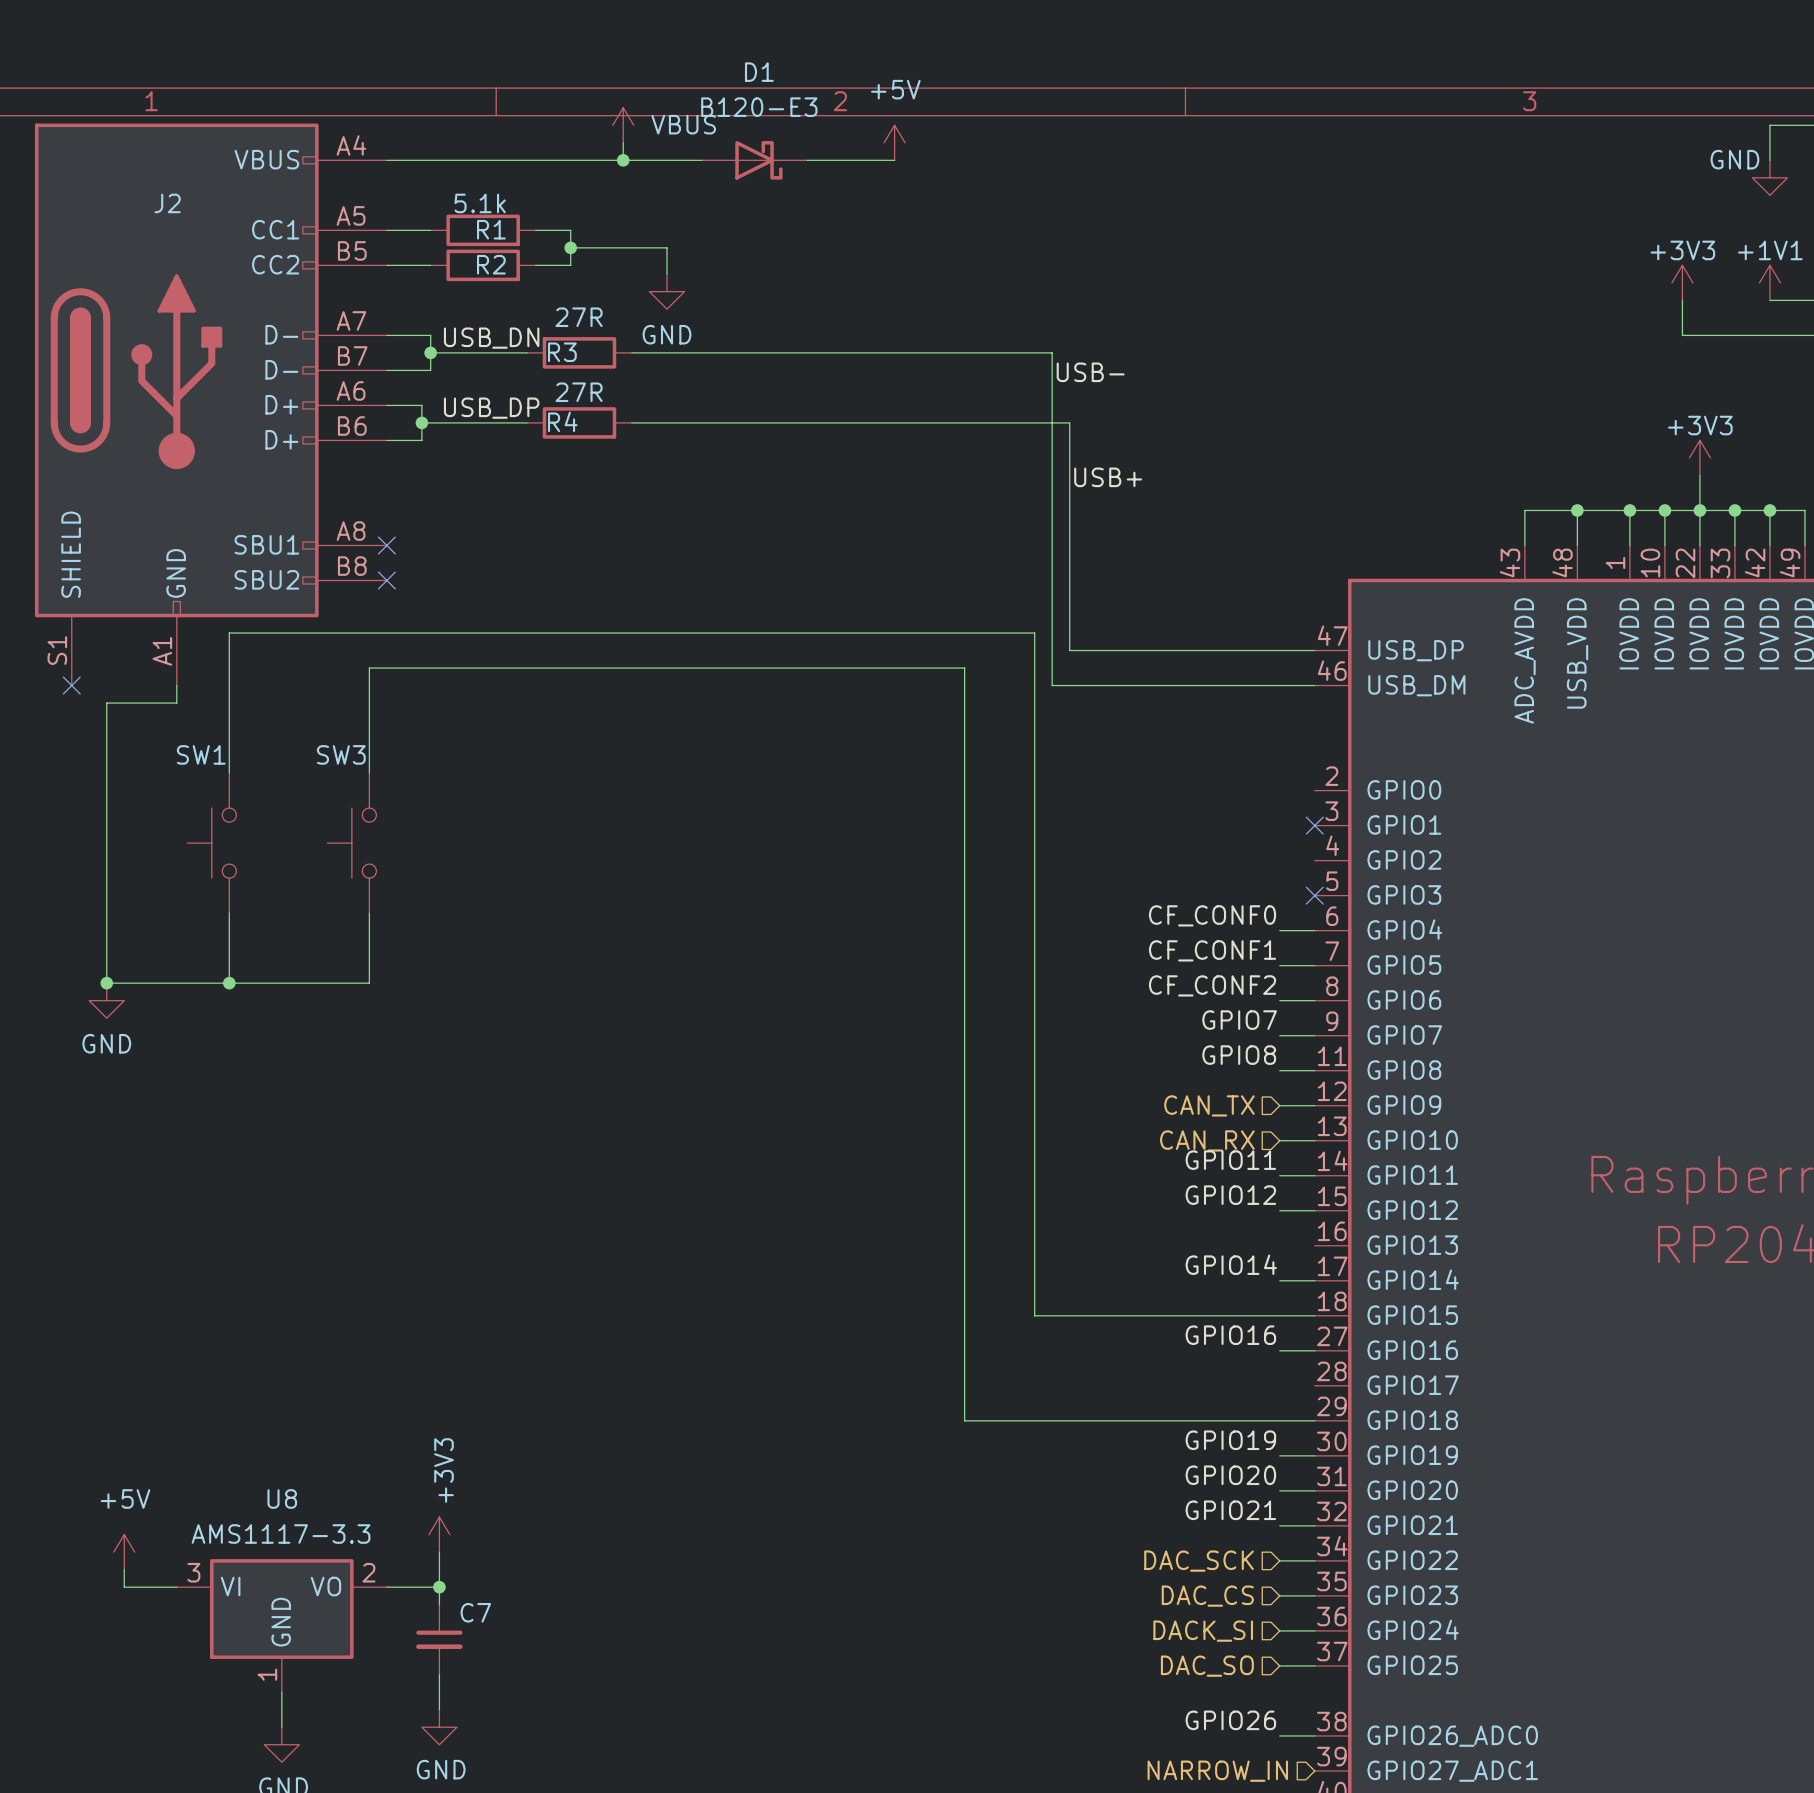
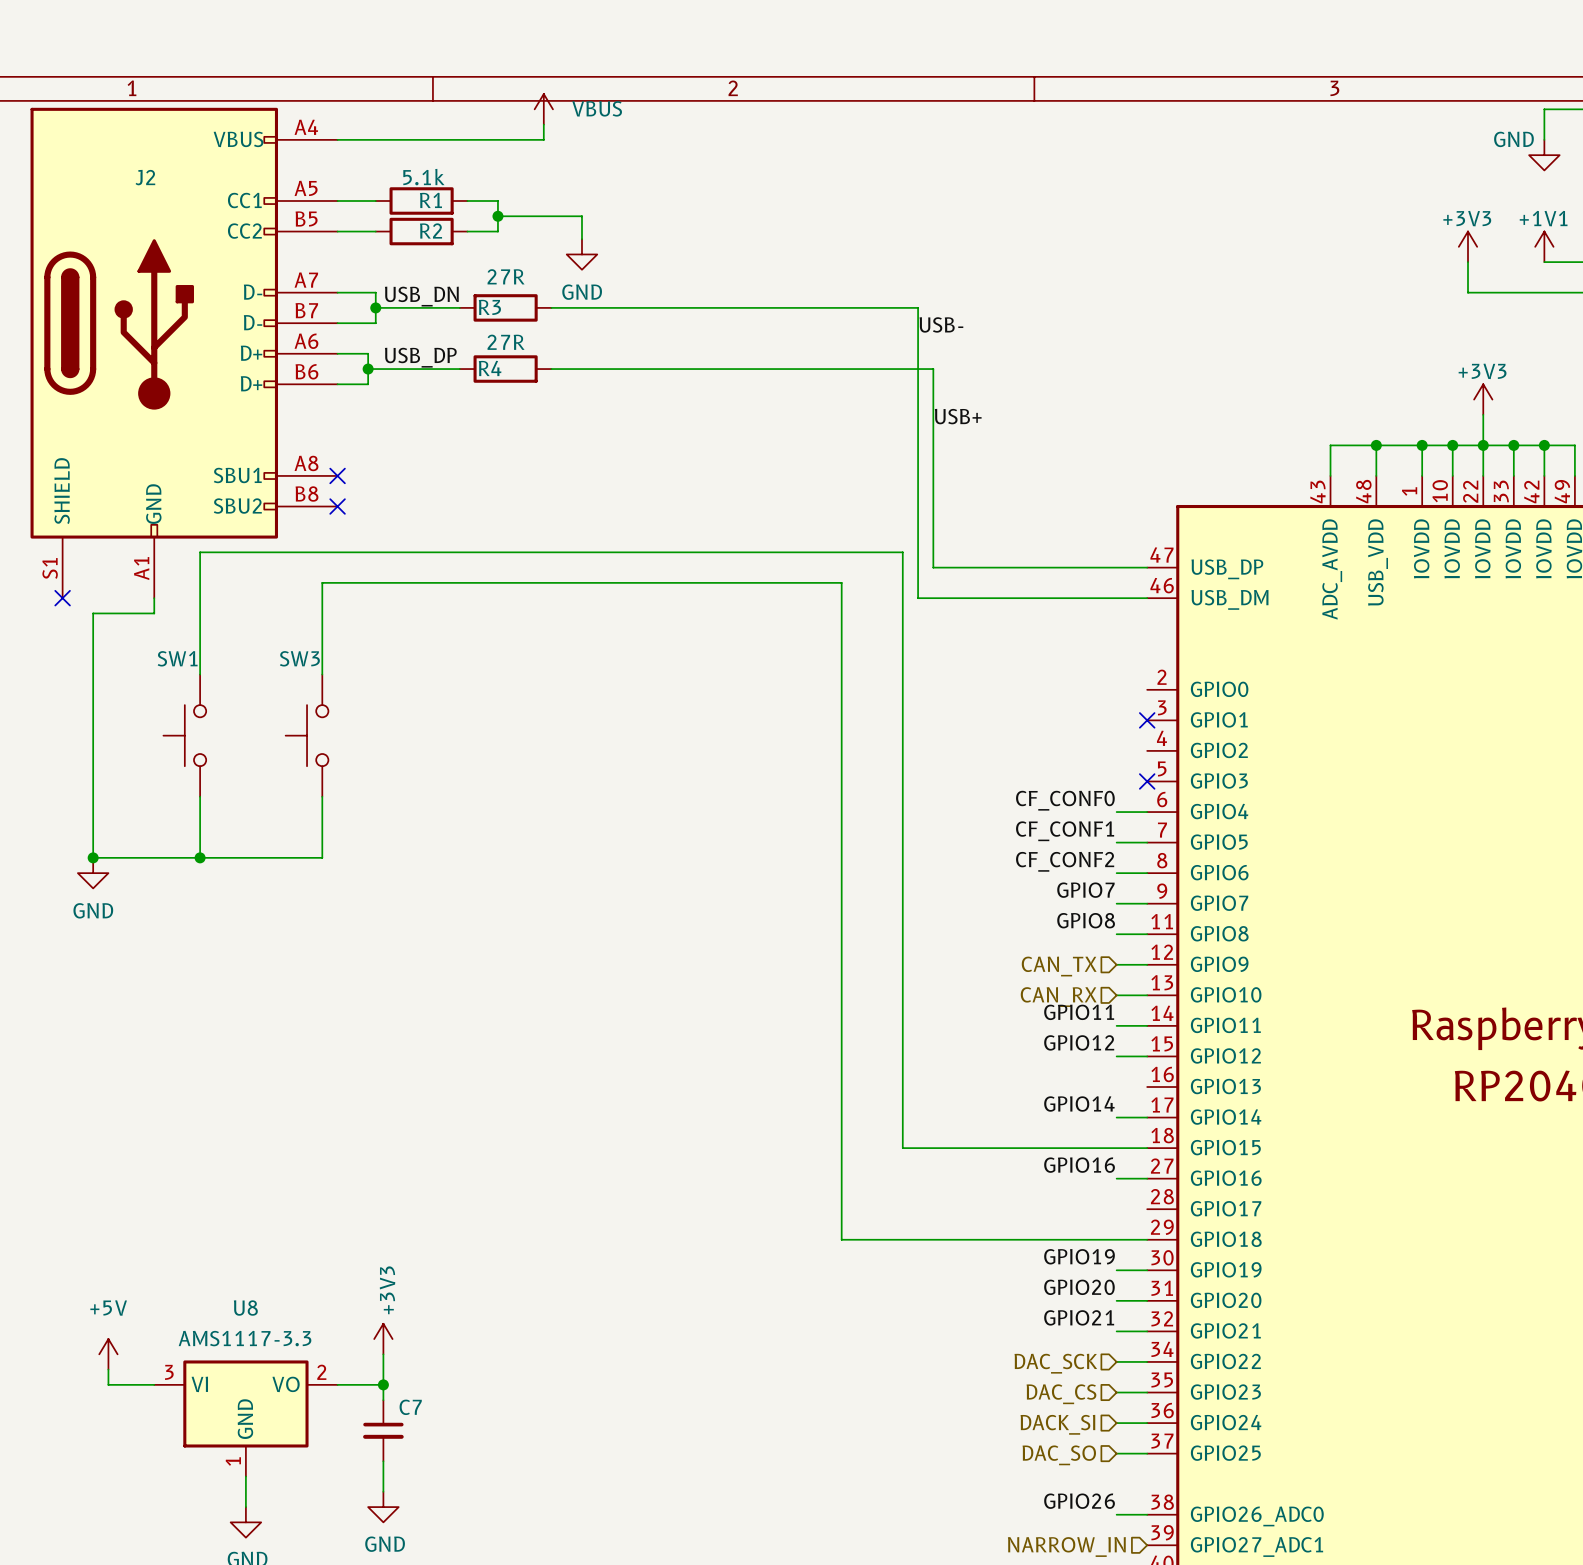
power symbol: +5V (894, 142) -> none
wire: (623, 160) (702, 160) -> none
junction: (623, 160) -> none
D1: B120-E3 (754, 160) -> none
wire: (807, 160) (894, 160) -> none

